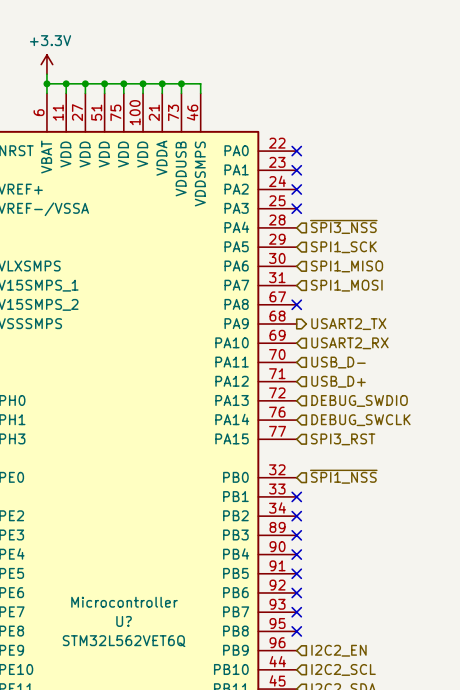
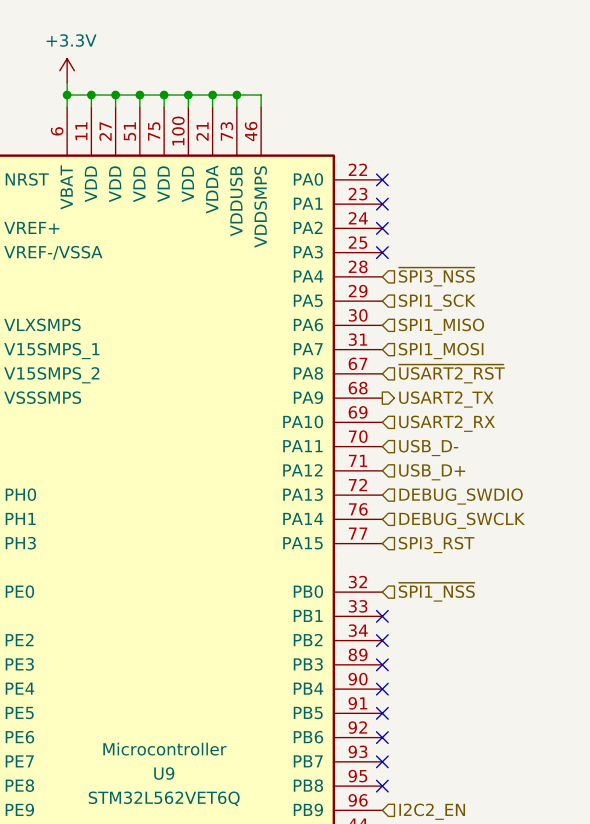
hierarchical label: none -> ~{USART2_RST} (451, 373)
no-connect mark: (296, 304) -> none
U? name: U? (124, 621) -> U9 (164, 773)

